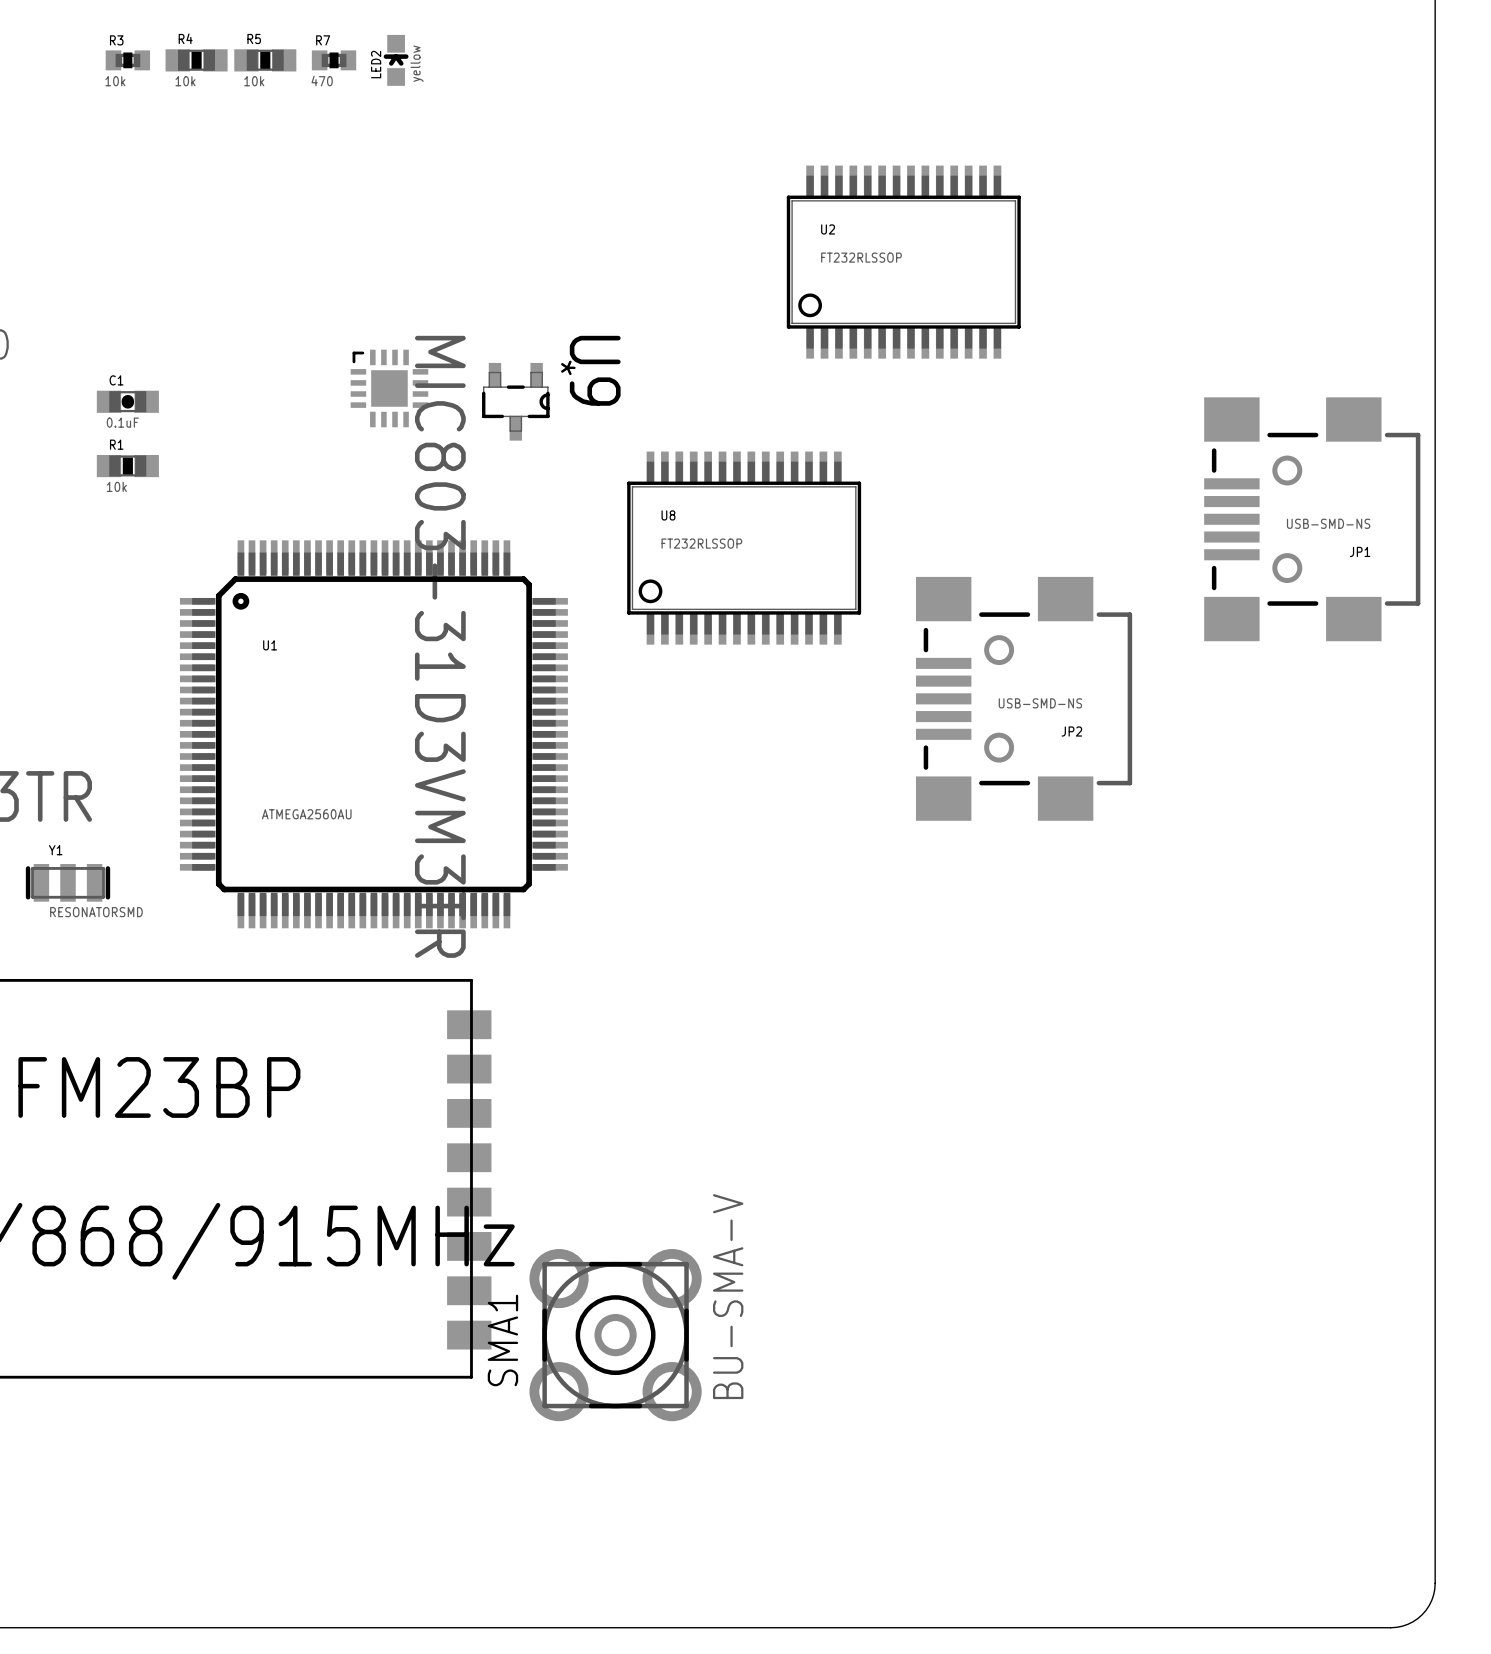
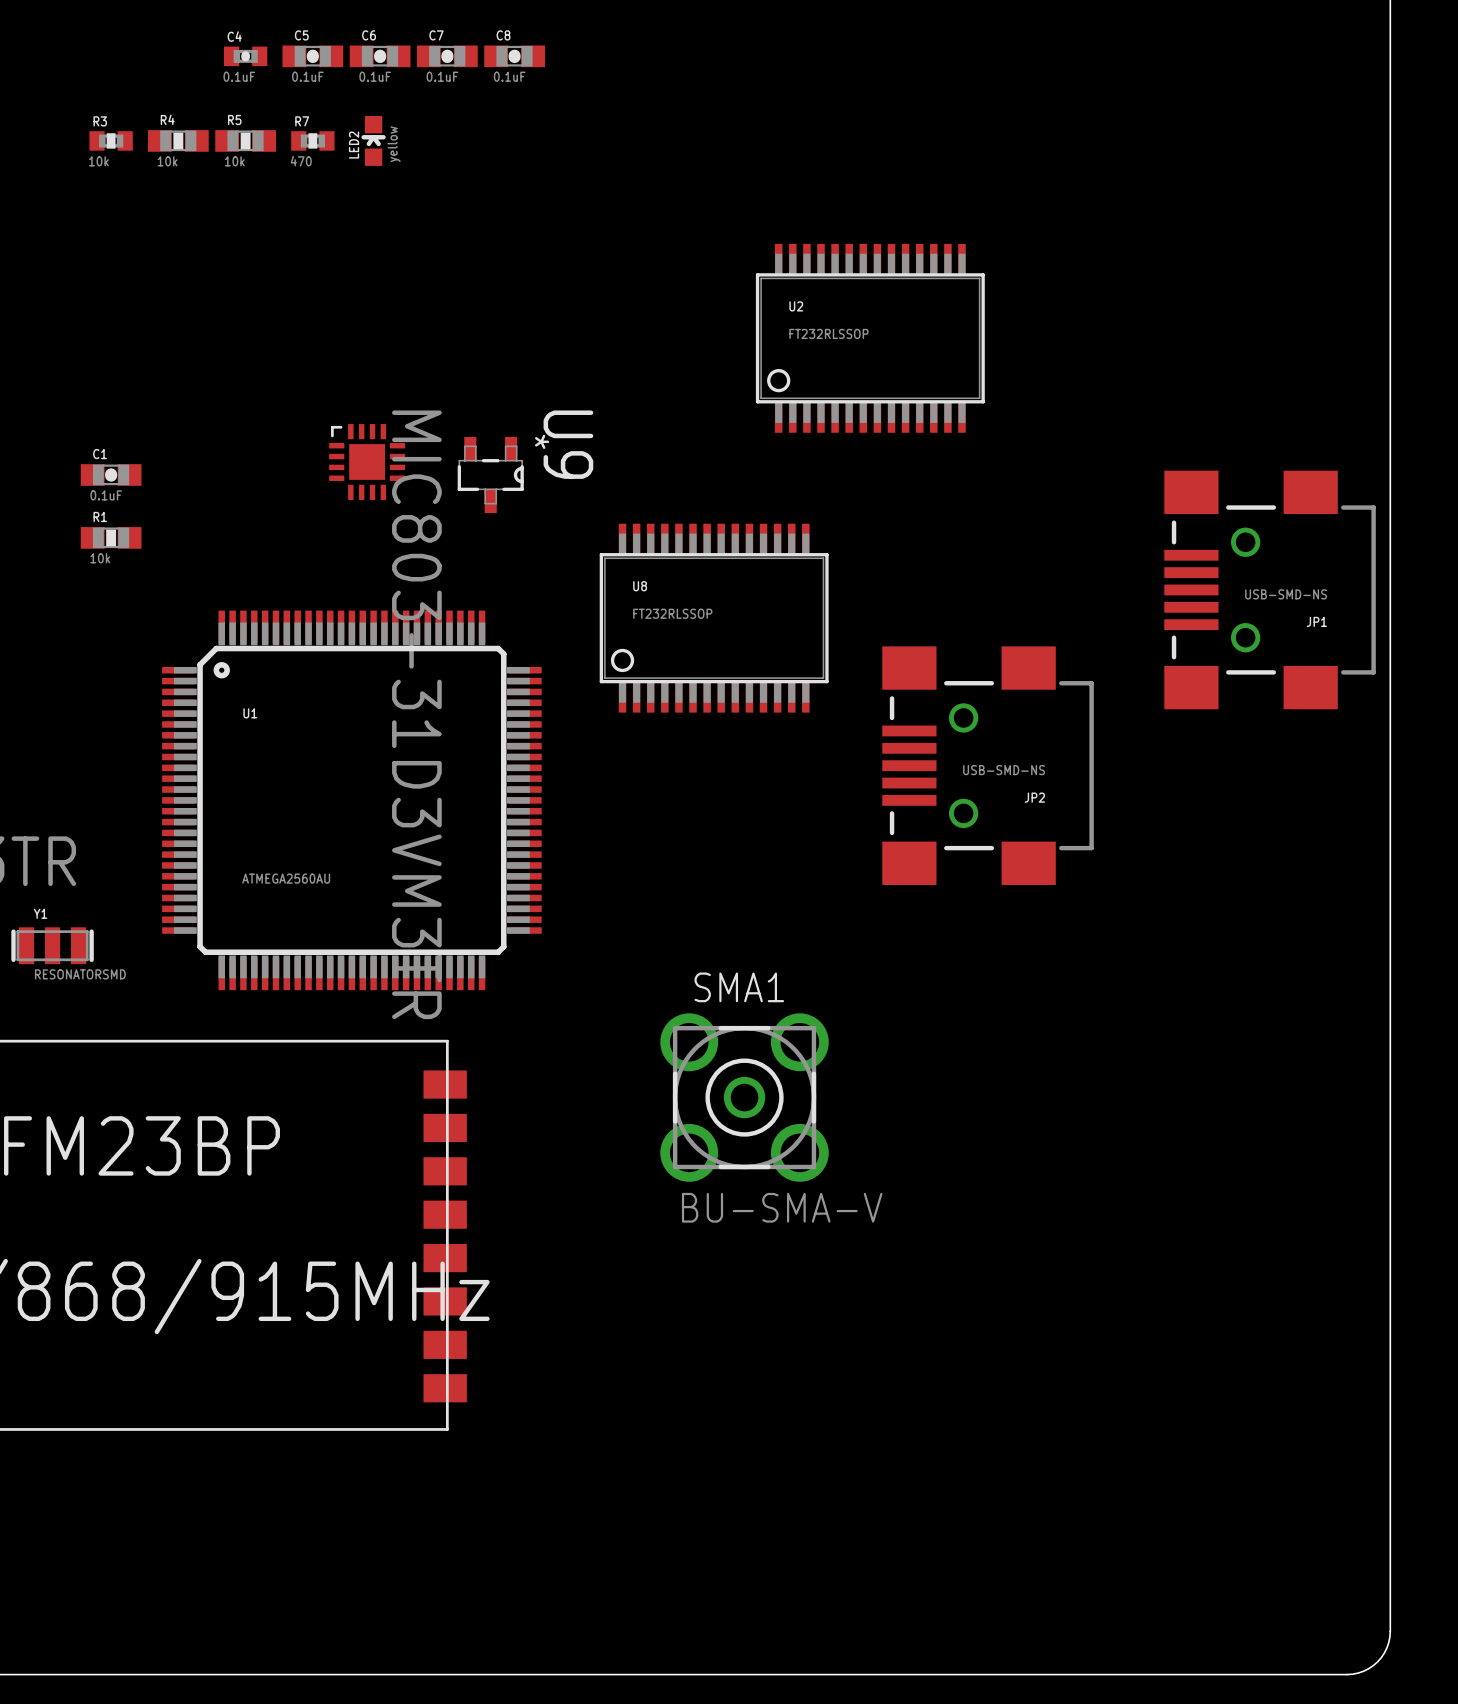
SMA1 value rotation: 0° (728, 1296) -> 90° clockwise (782, 1207)
SMA1 position: (615, 1335) -> (744, 1097)
SMA1 name rotation: 0° (502, 1340) -> 90° clockwise (739, 987)
SMA1 name position: SMA1 (502, 1340) -> SMA1 (739, 987)

